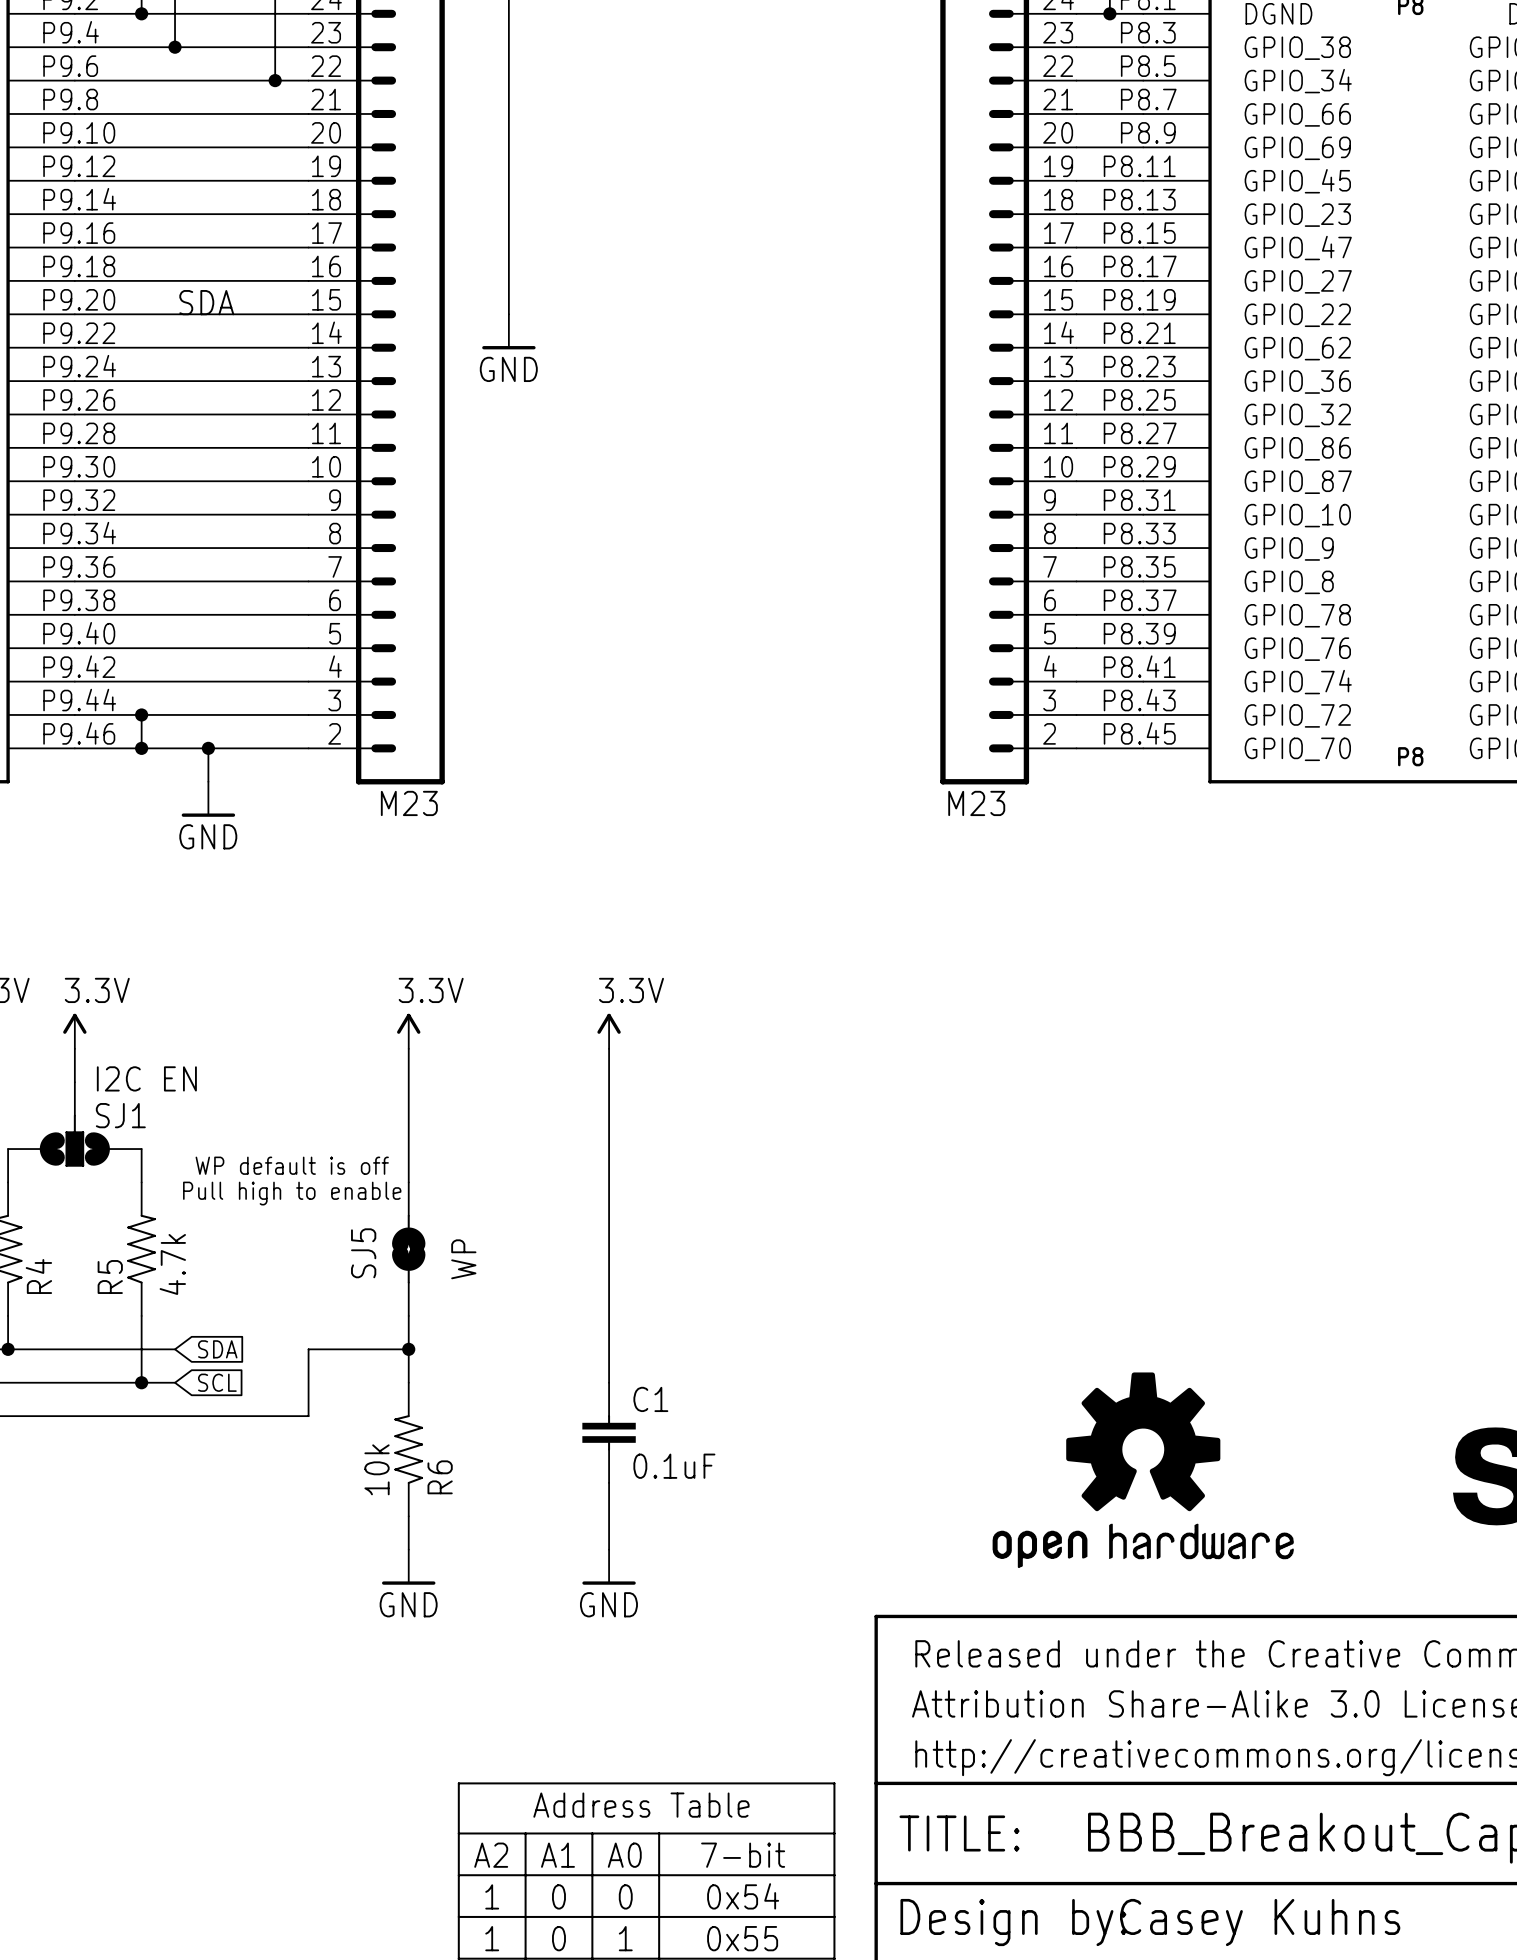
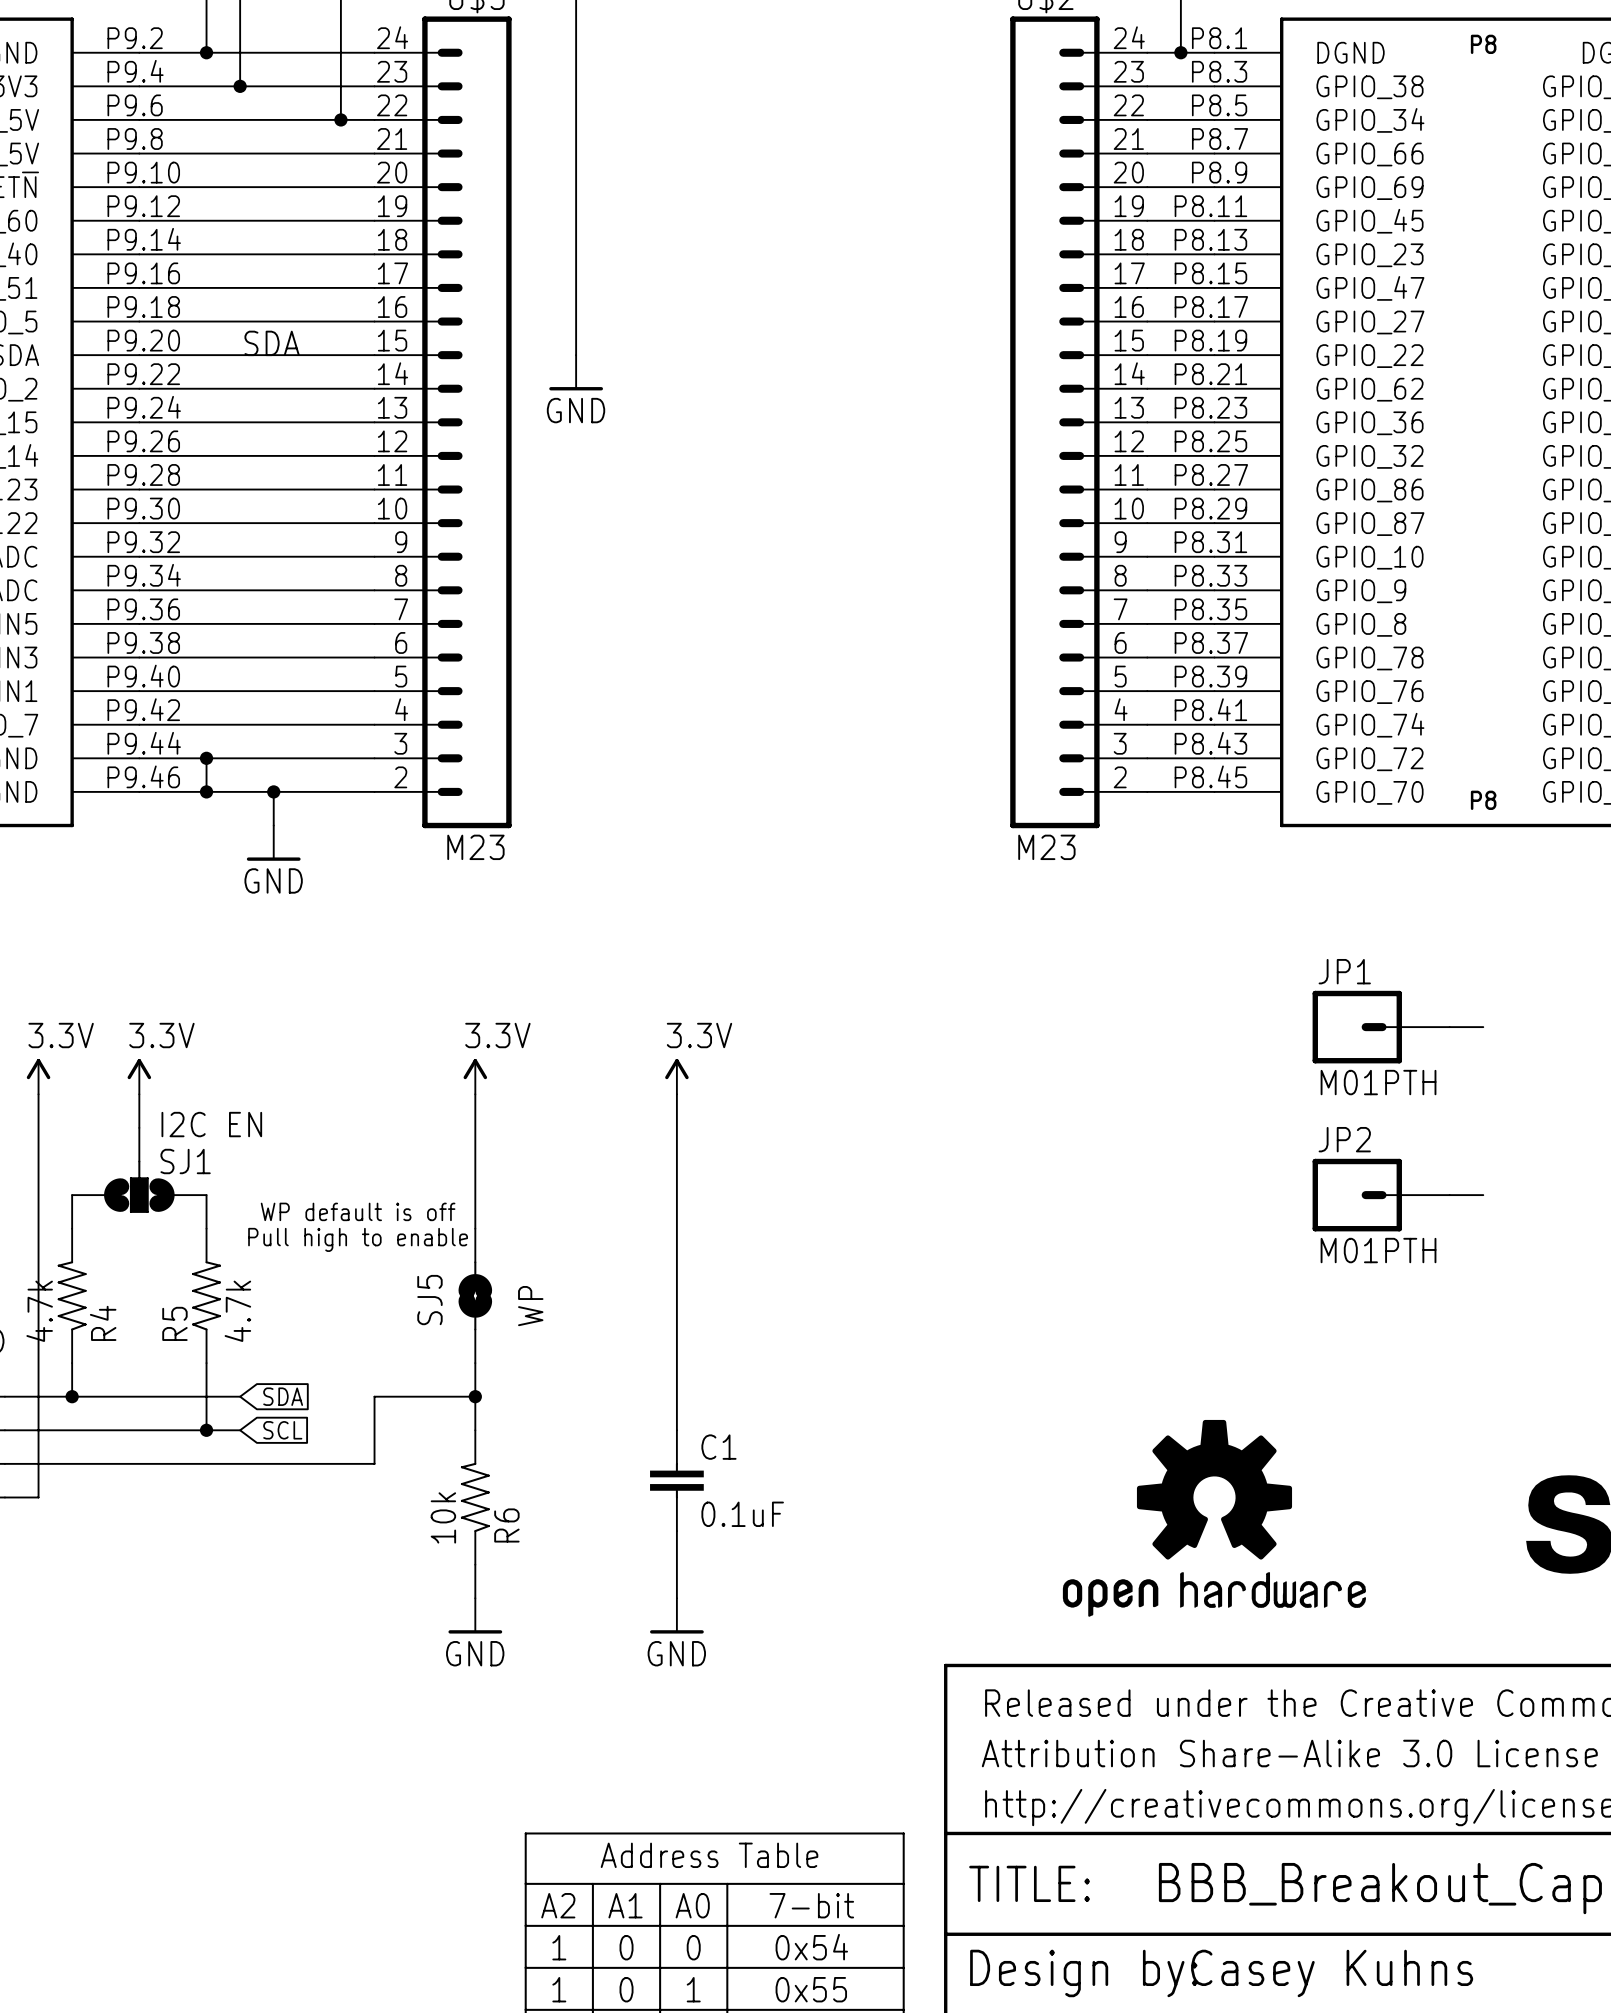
JP1: none -> M01PTH (1381, 1027)
wire: none -> (1449, 1027) (1483, 1027)
JP2: none -> M01PTH (1381, 1195)
wire: none -> (1449, 1195) (1483, 1195)

